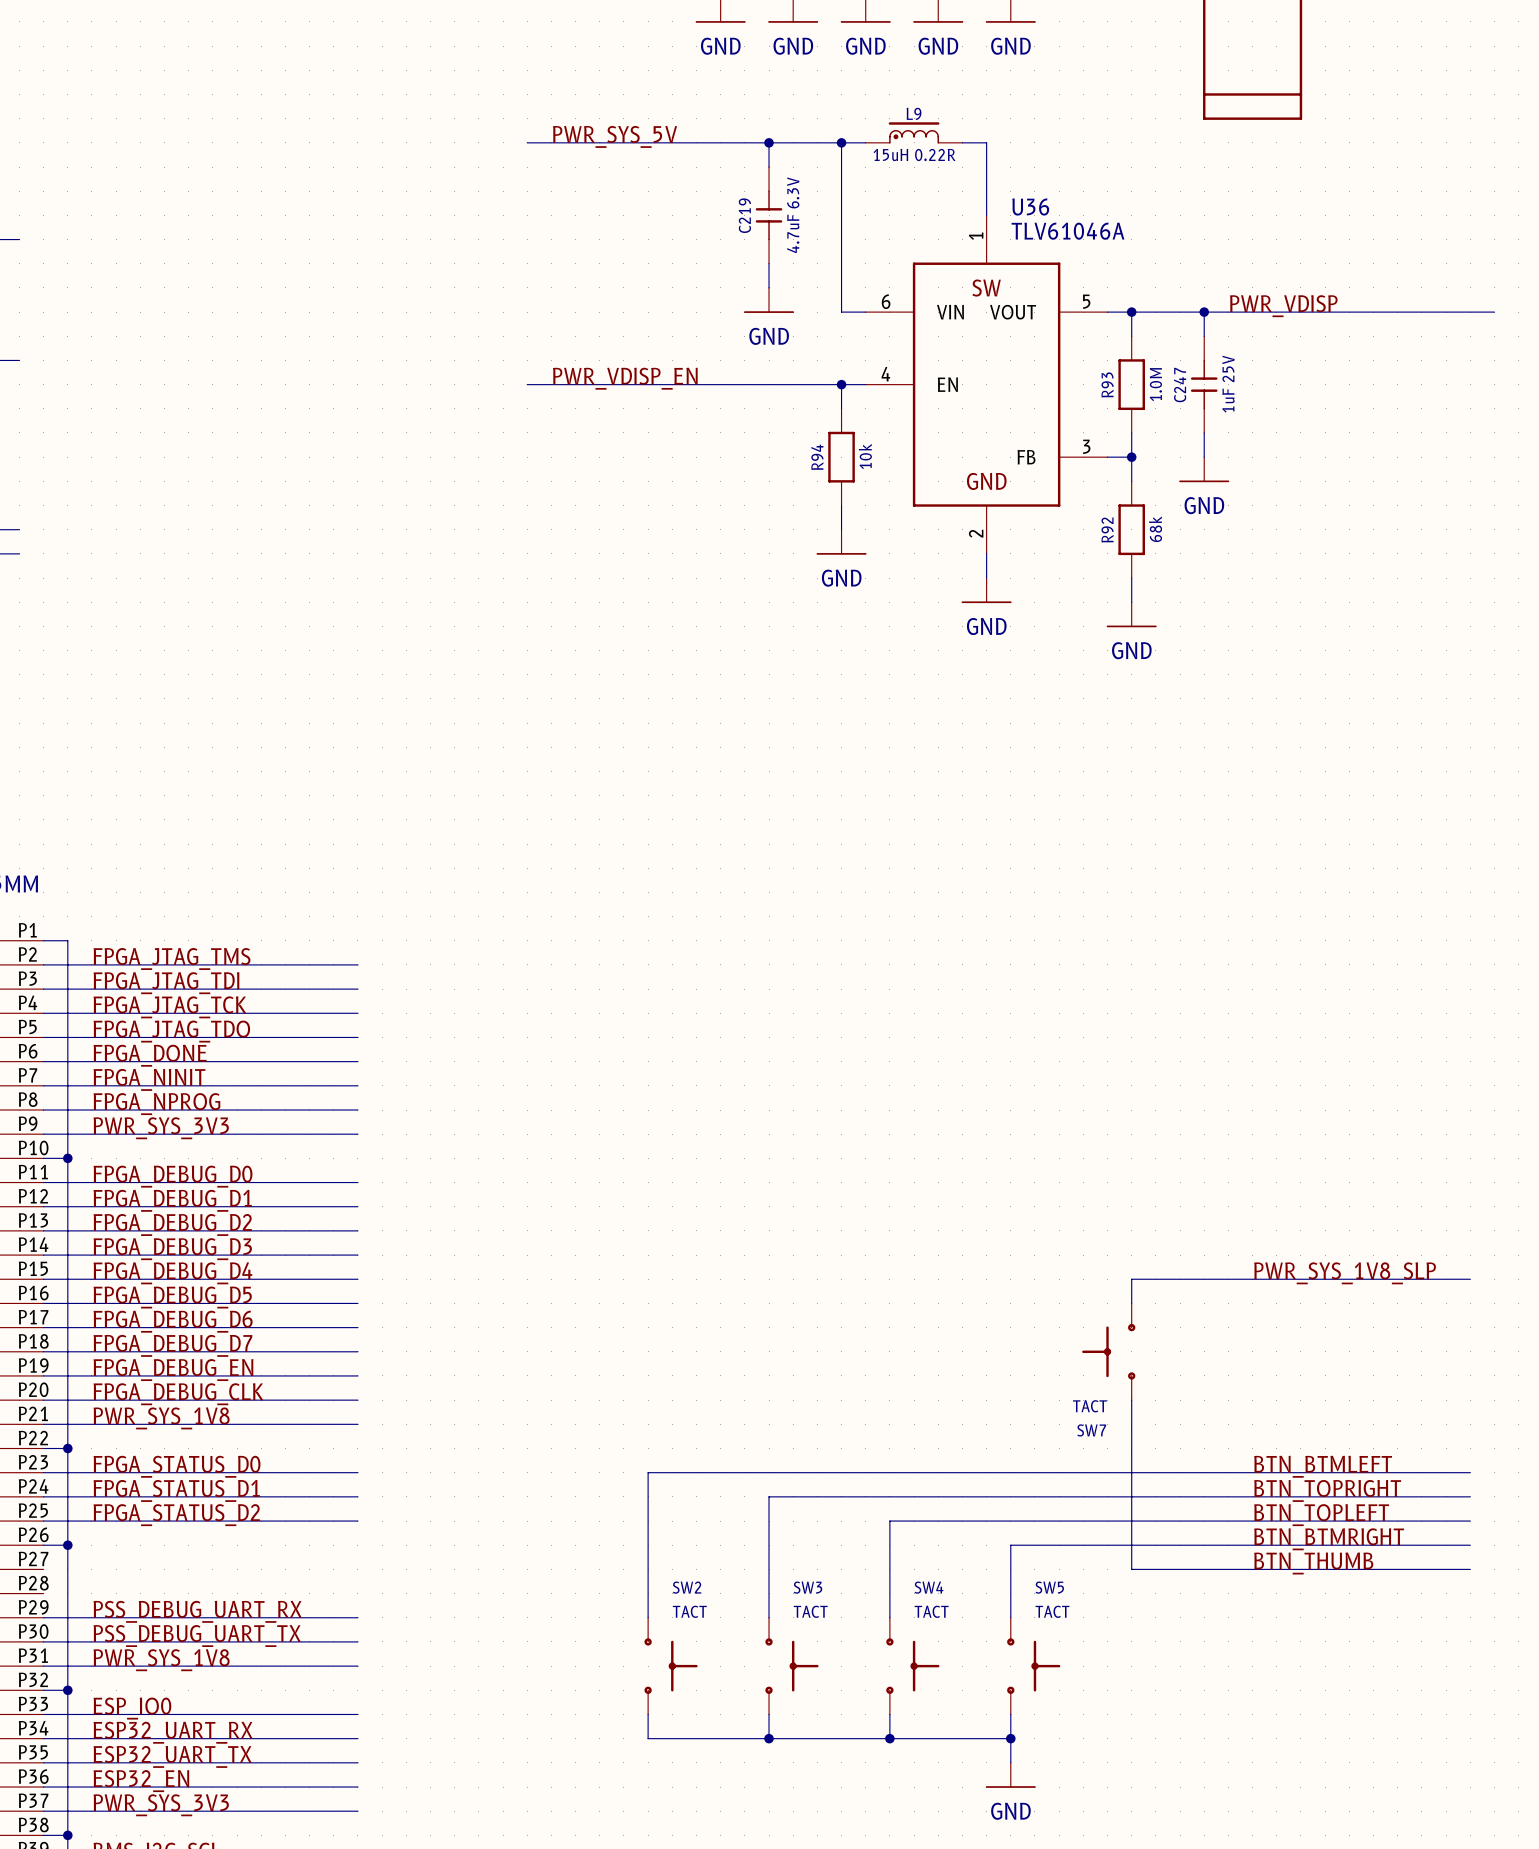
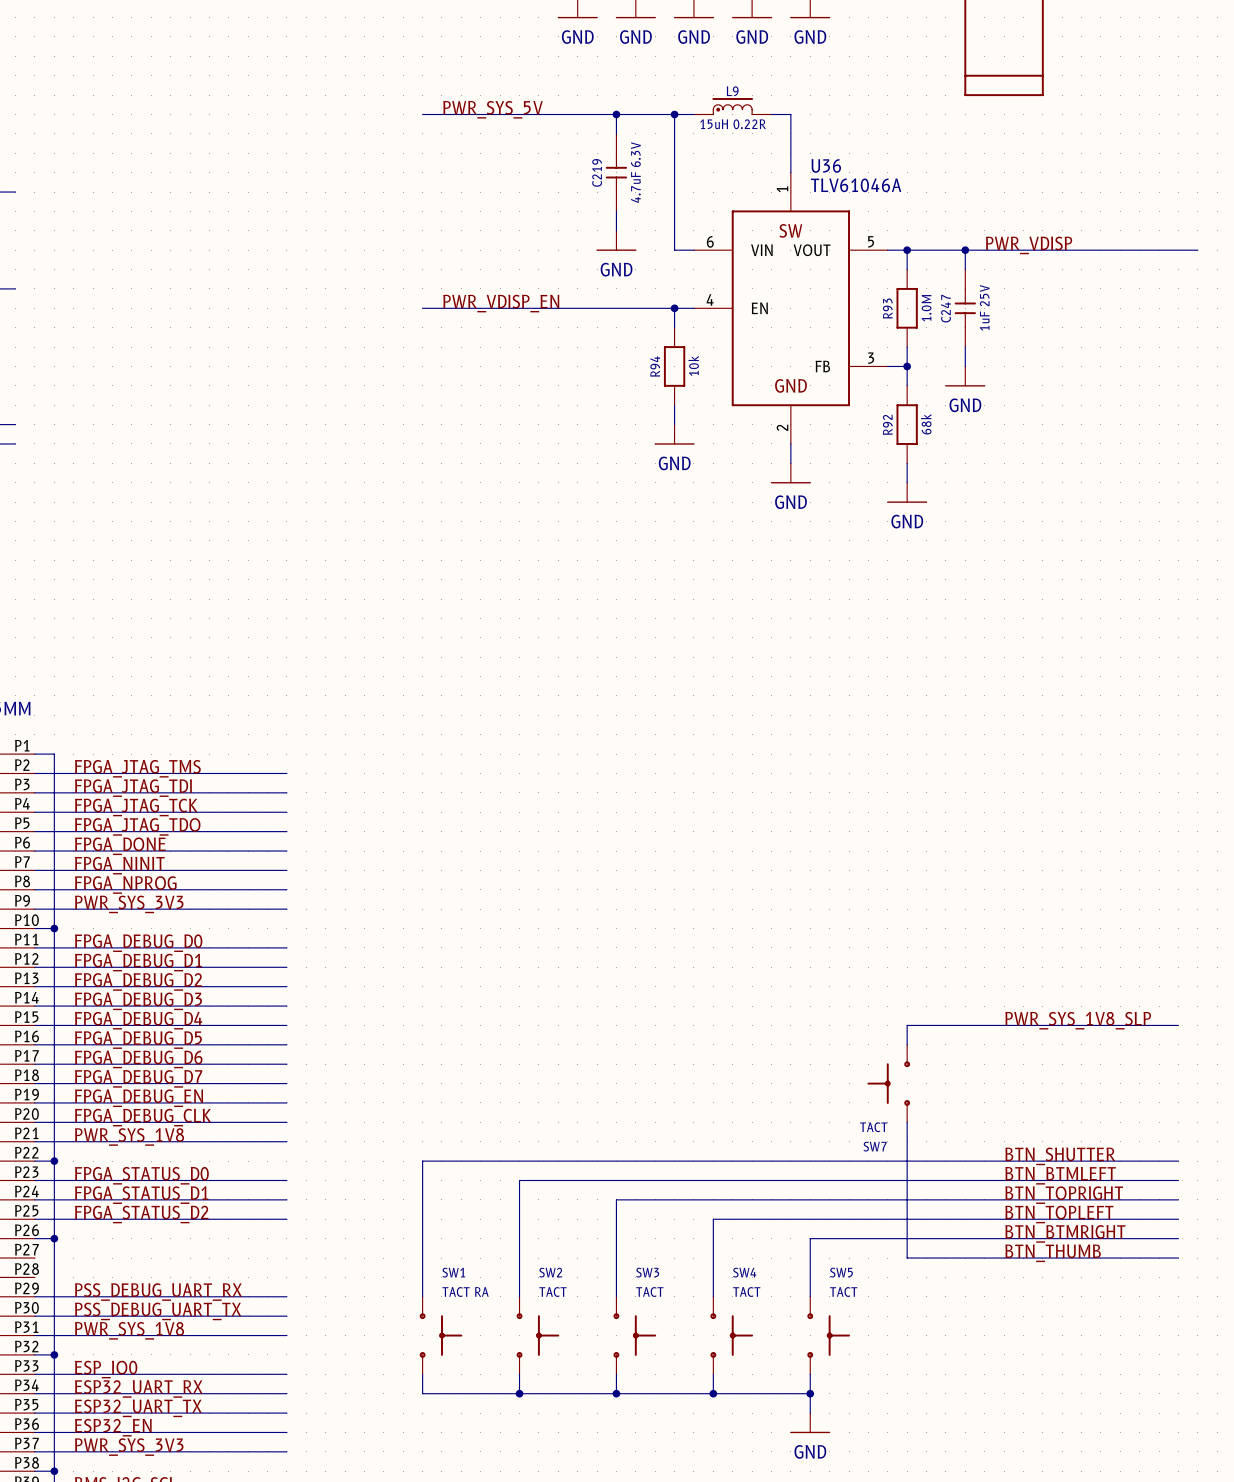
label: none -> BTN_SHUTTER (1060, 1156)
wire: none -> (1178, 1161) (422, 1161) (422, 1296)
SW1: none -> TACT RA (441, 1335)
wire: none -> (422, 1374) (422, 1393) (519, 1393)
junction: none -> (519, 1393)

